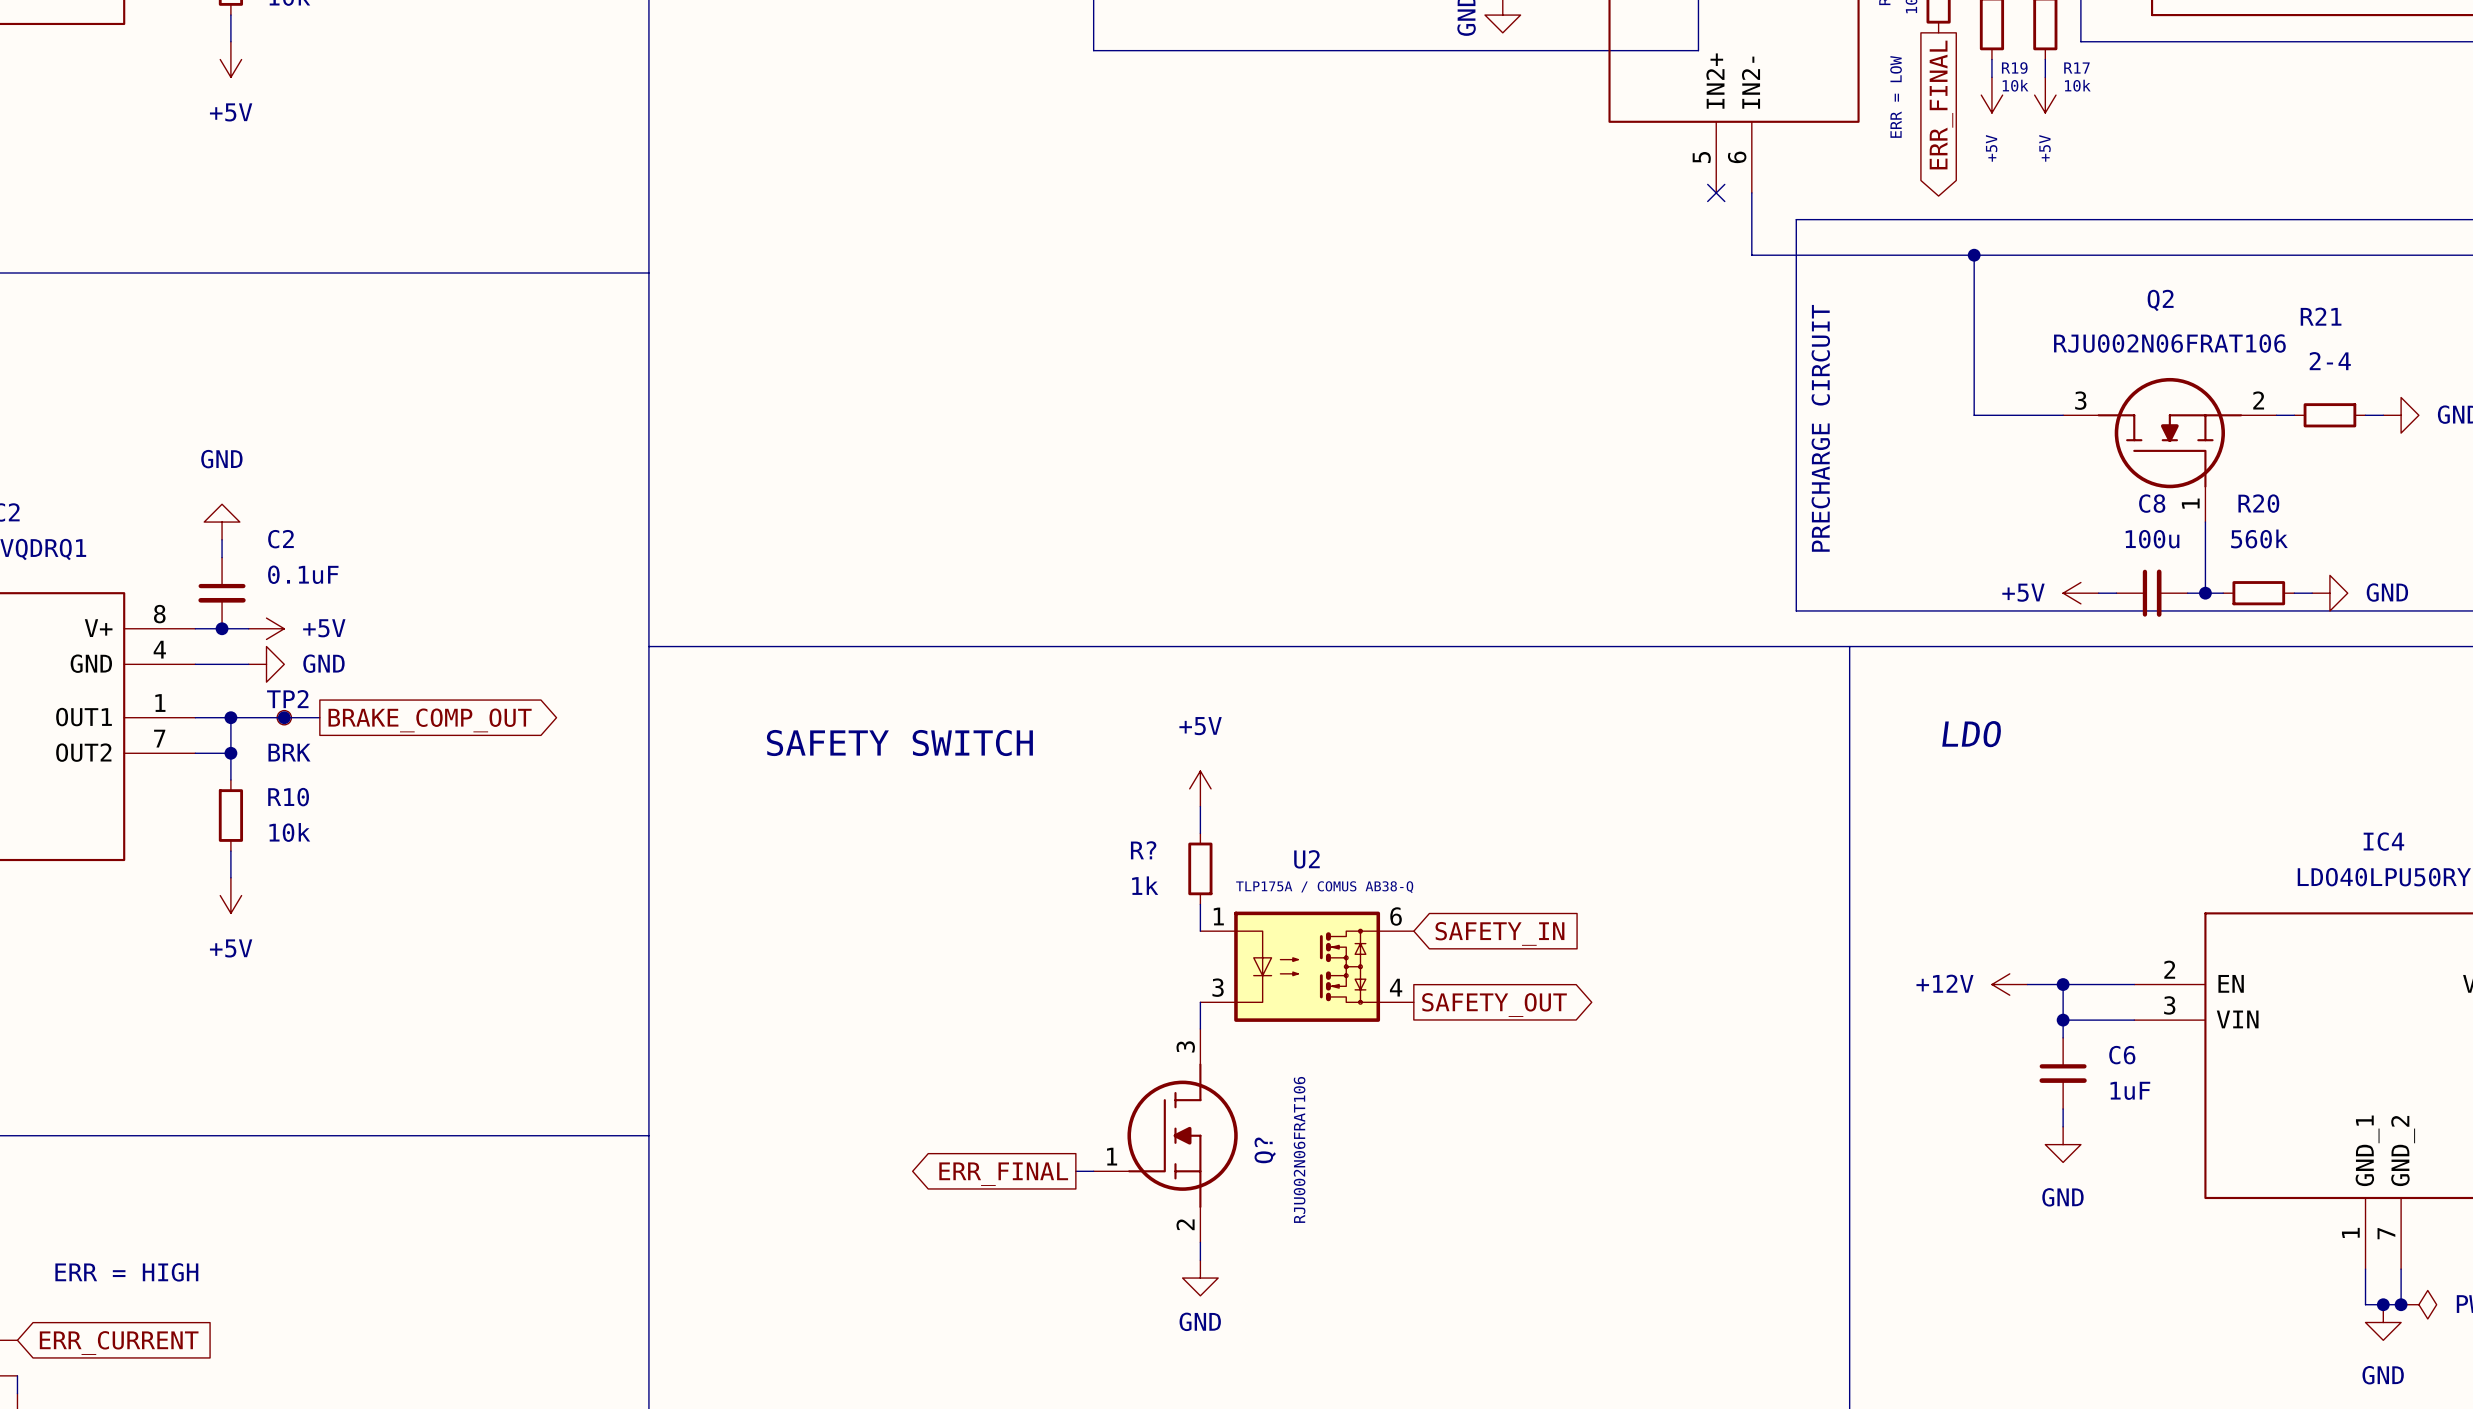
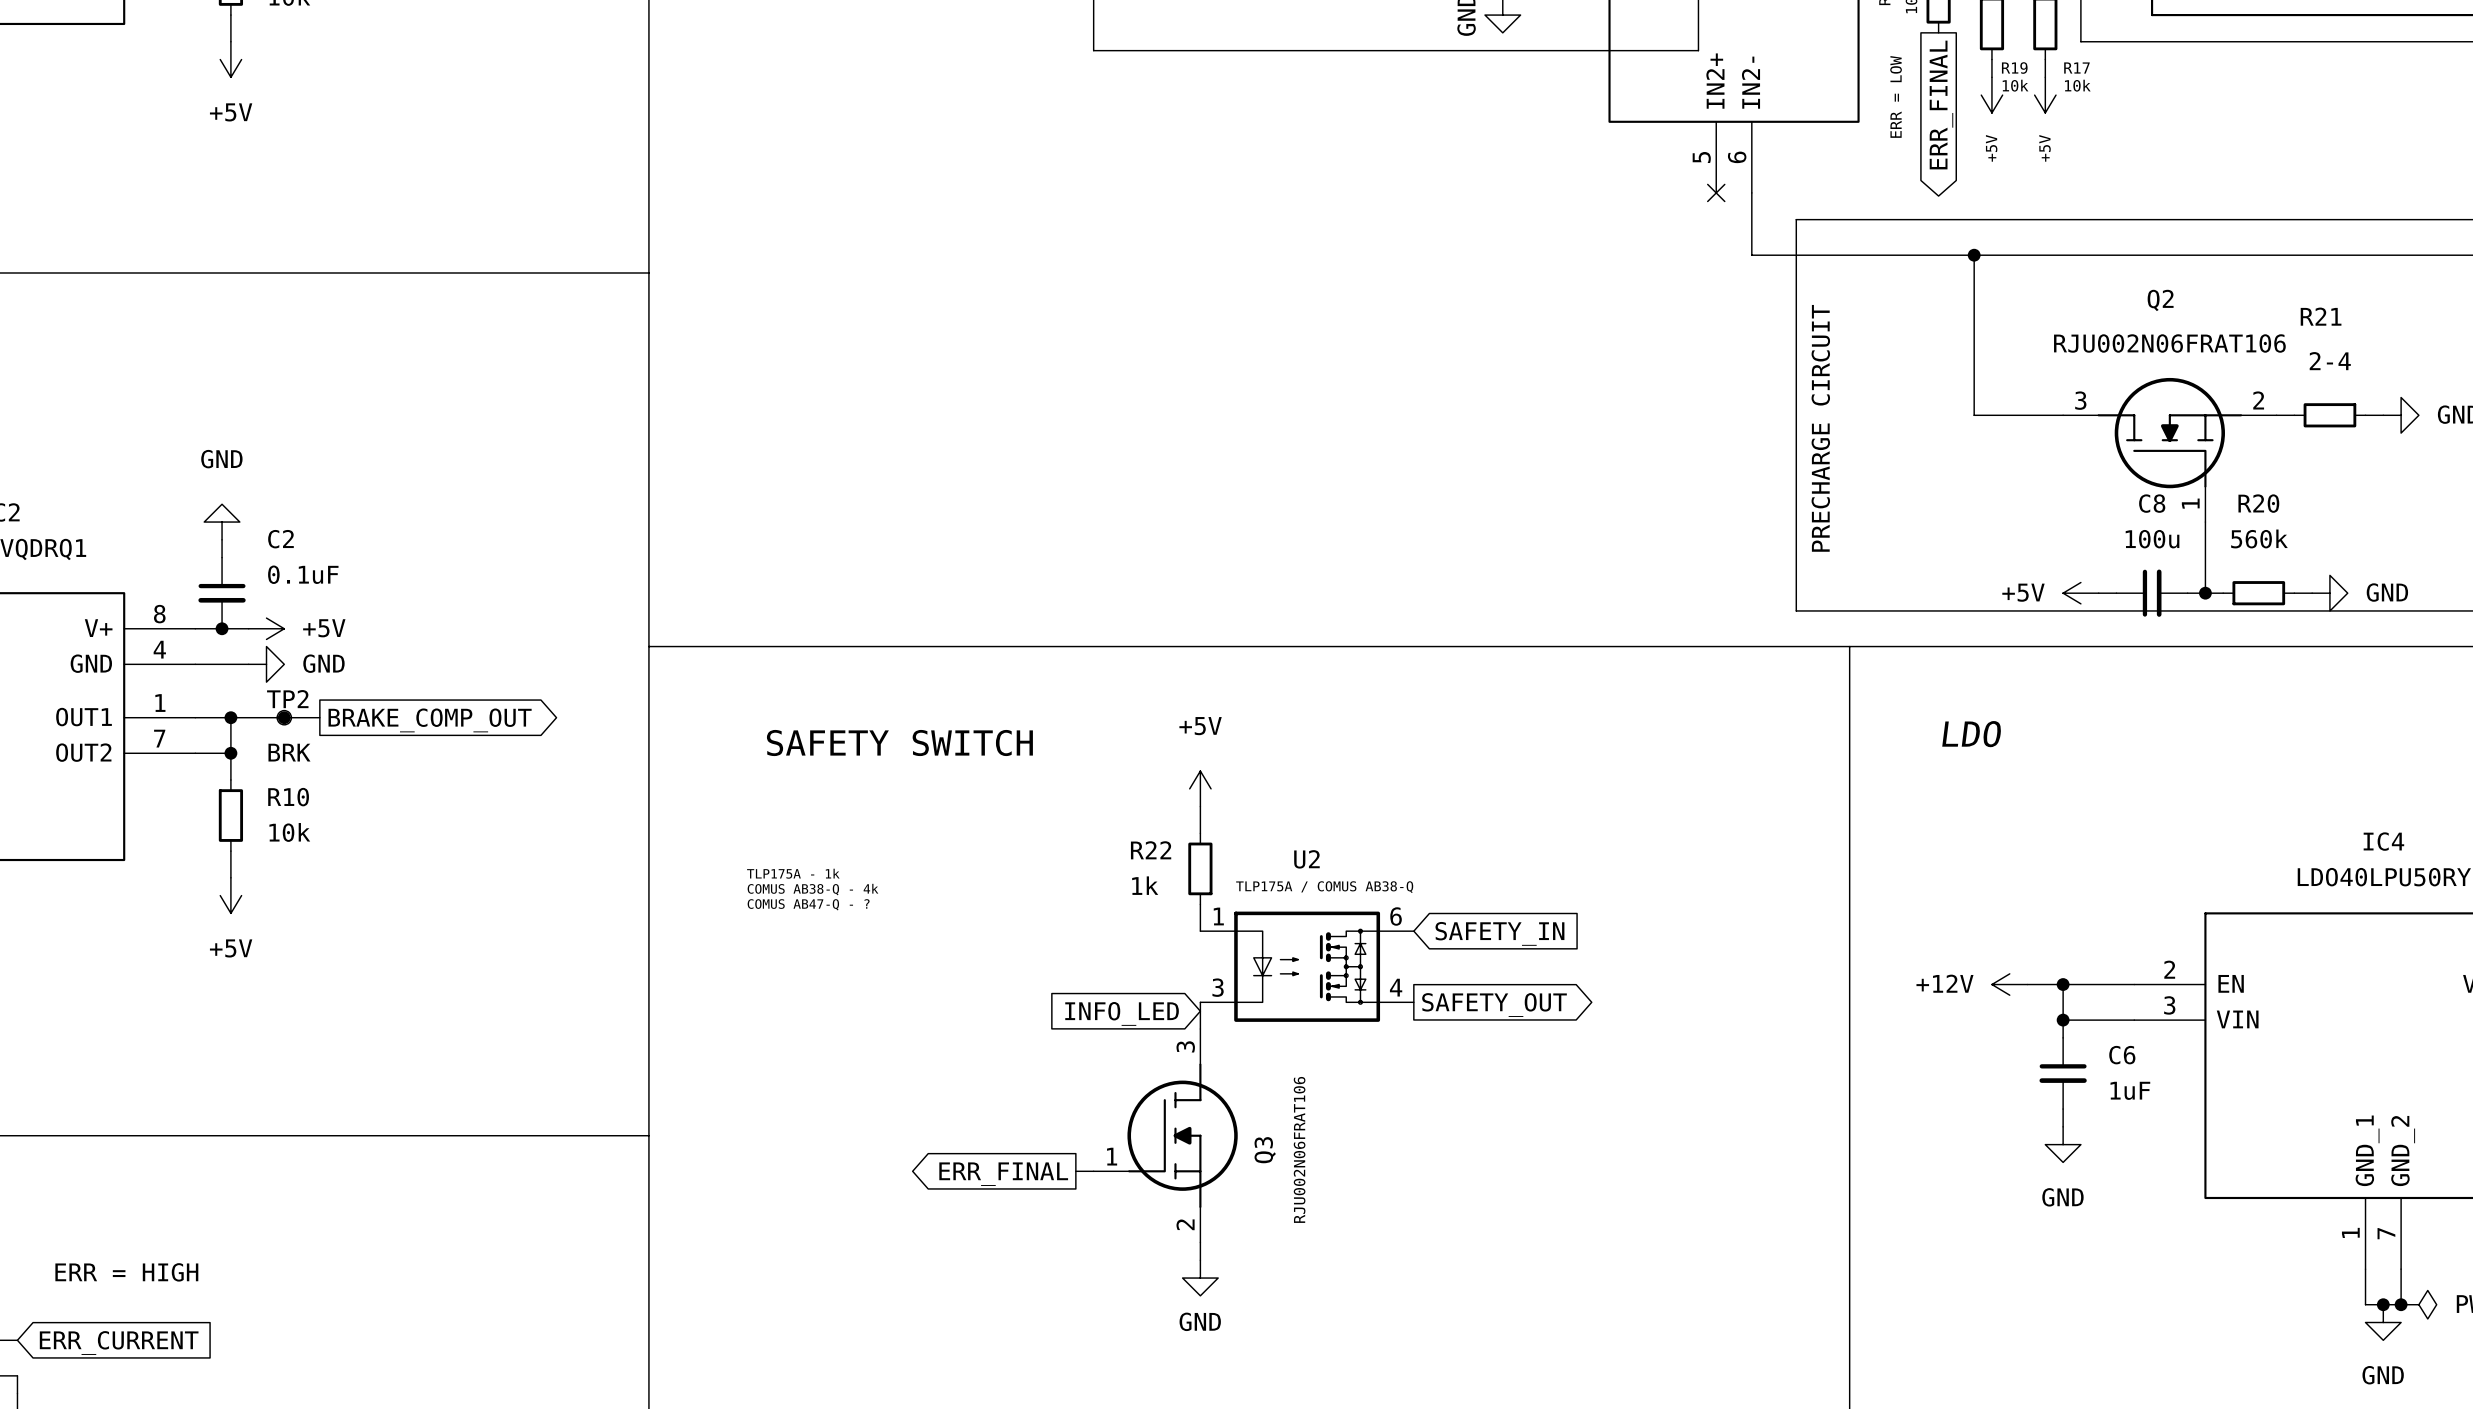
R? name: R? (1143, 850) -> R22 (1151, 850)
text: none -> TLP175A - 1k (793, 873)
text: none -> COMUS AB38-Q - 4k (812, 889)
text: none -> COMUS AB47-Q - ? (808, 904)
global label: none -> INFO_LED (1122, 1013)
Q? name: Q? (1265, 1150) -> Q3 (1265, 1150)

